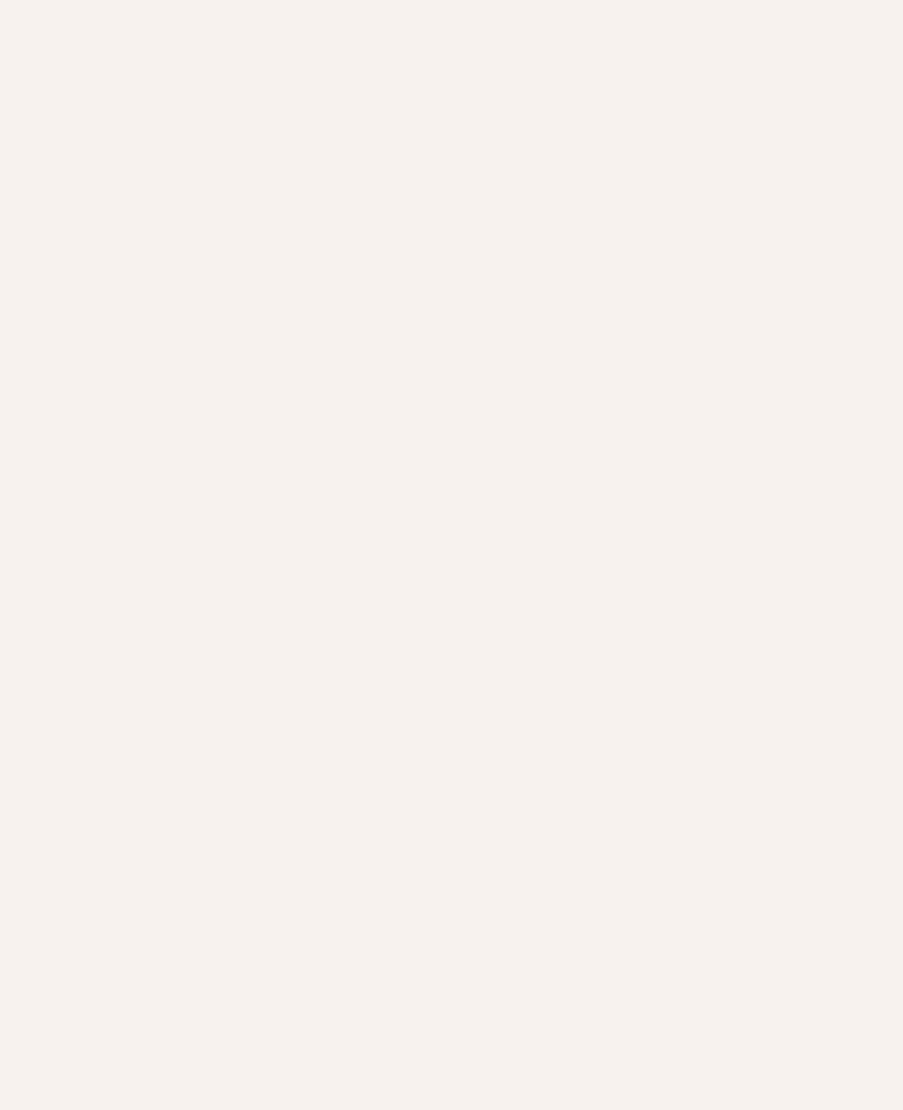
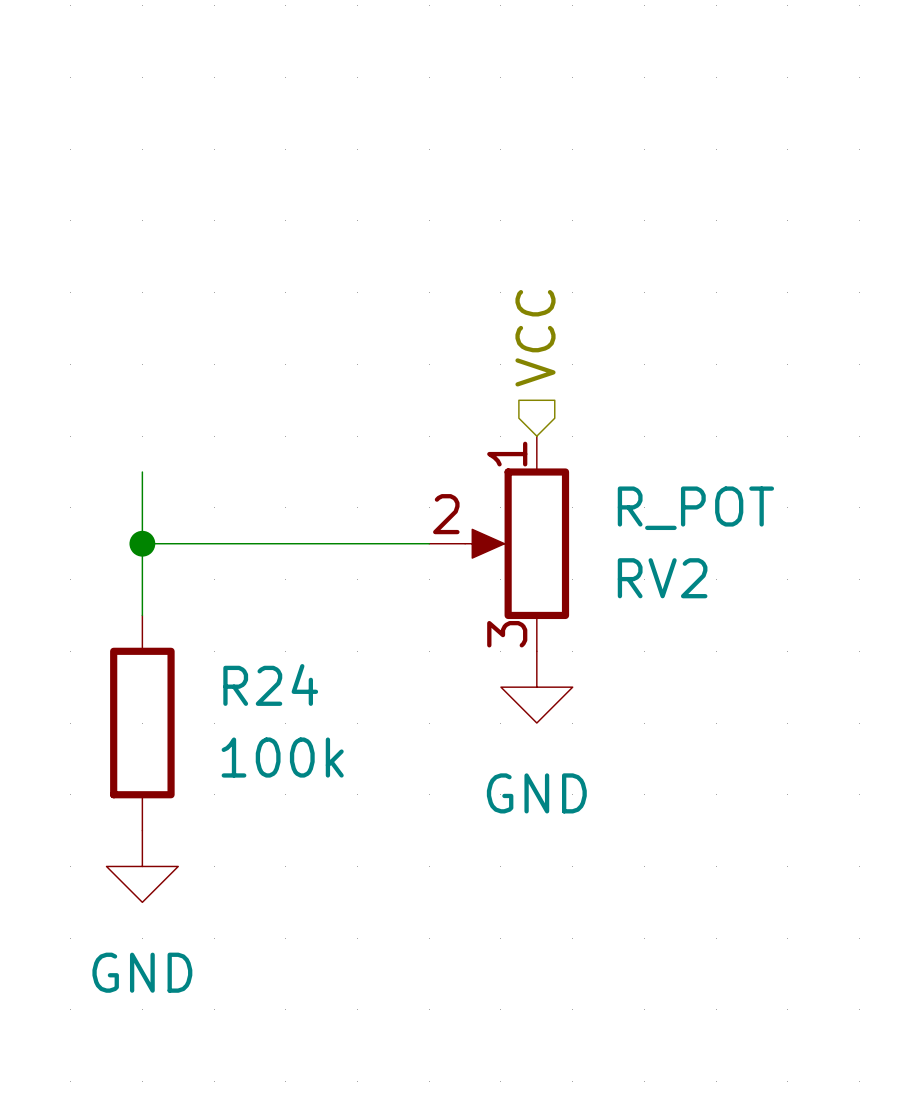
hierarchical label: none -> VCC (535, 338)
wire: none -> (142, 472) (142, 615)
wire: none -> (142, 543) (429, 543)
junction: none -> (142, 543)
RV2: none -> R_POT (499, 543)
power symbol: none -> GND (536, 687)
R24: none -> 100k (142, 723)
power symbol: none -> GND (142, 866)

